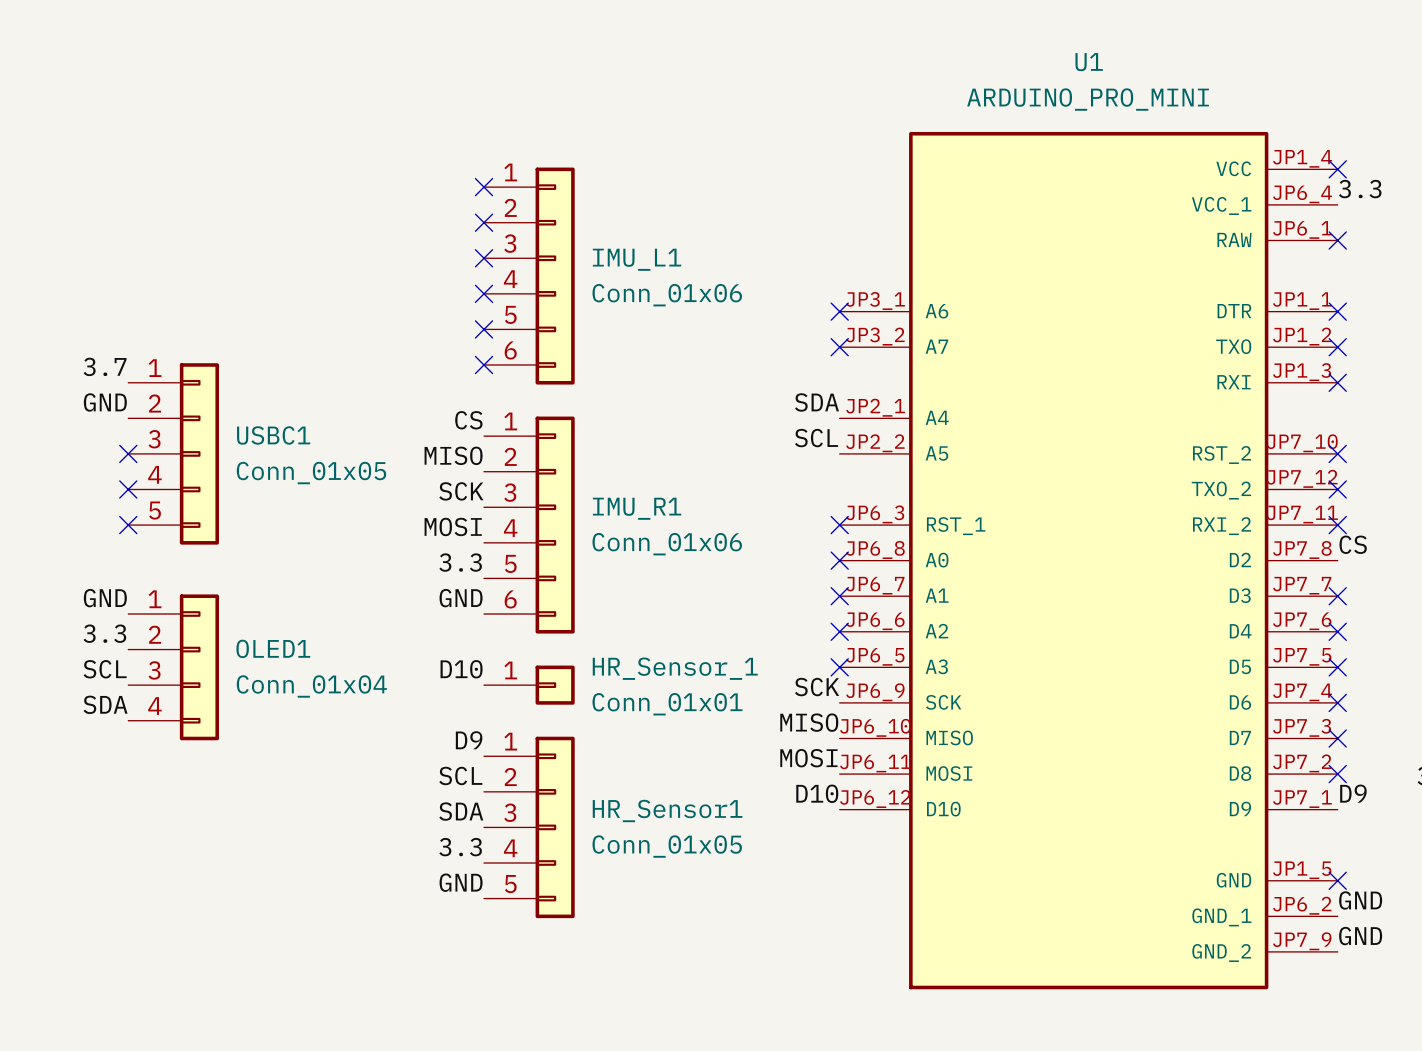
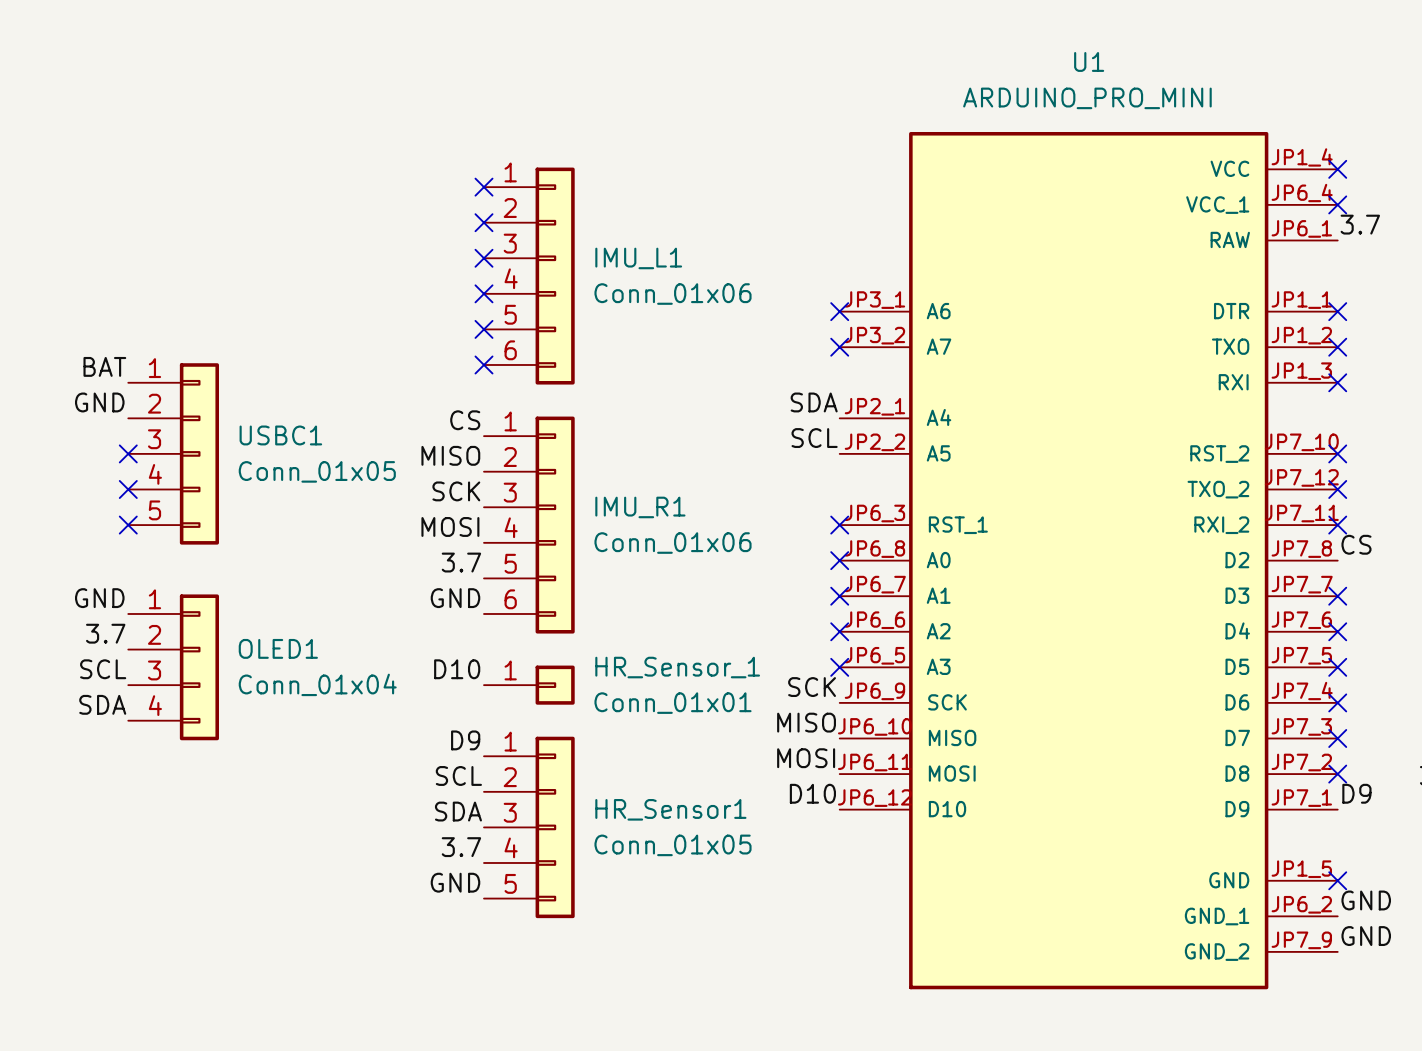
label: 3.3 (1360, 189) -> 3.7 (1360, 224)
no-connect mark position: (1337, 240) -> (1337, 204)
label: 3.7 (105, 366) -> BAT (104, 366)
label: 3.3 (460, 562) -> 3.7 (461, 562)
label: 3.3 (104, 633) -> 3.7 (105, 633)
label: 3.3 (460, 847) -> 3.7 (461, 847)

